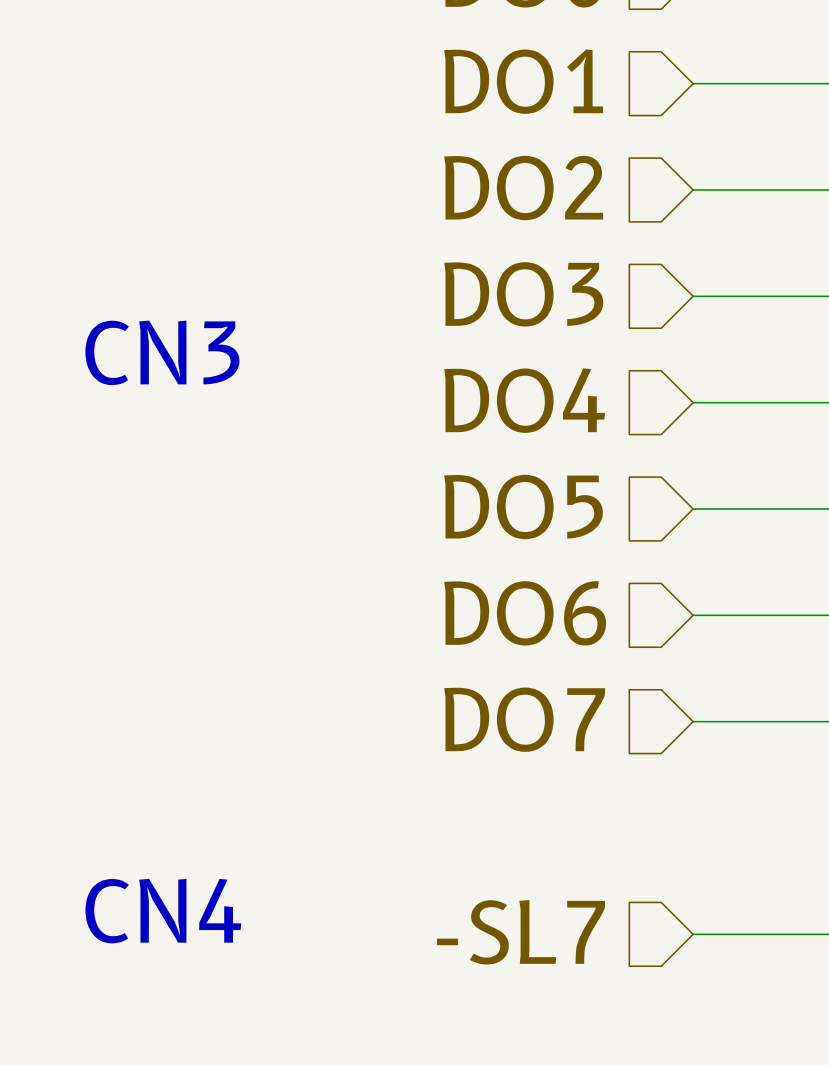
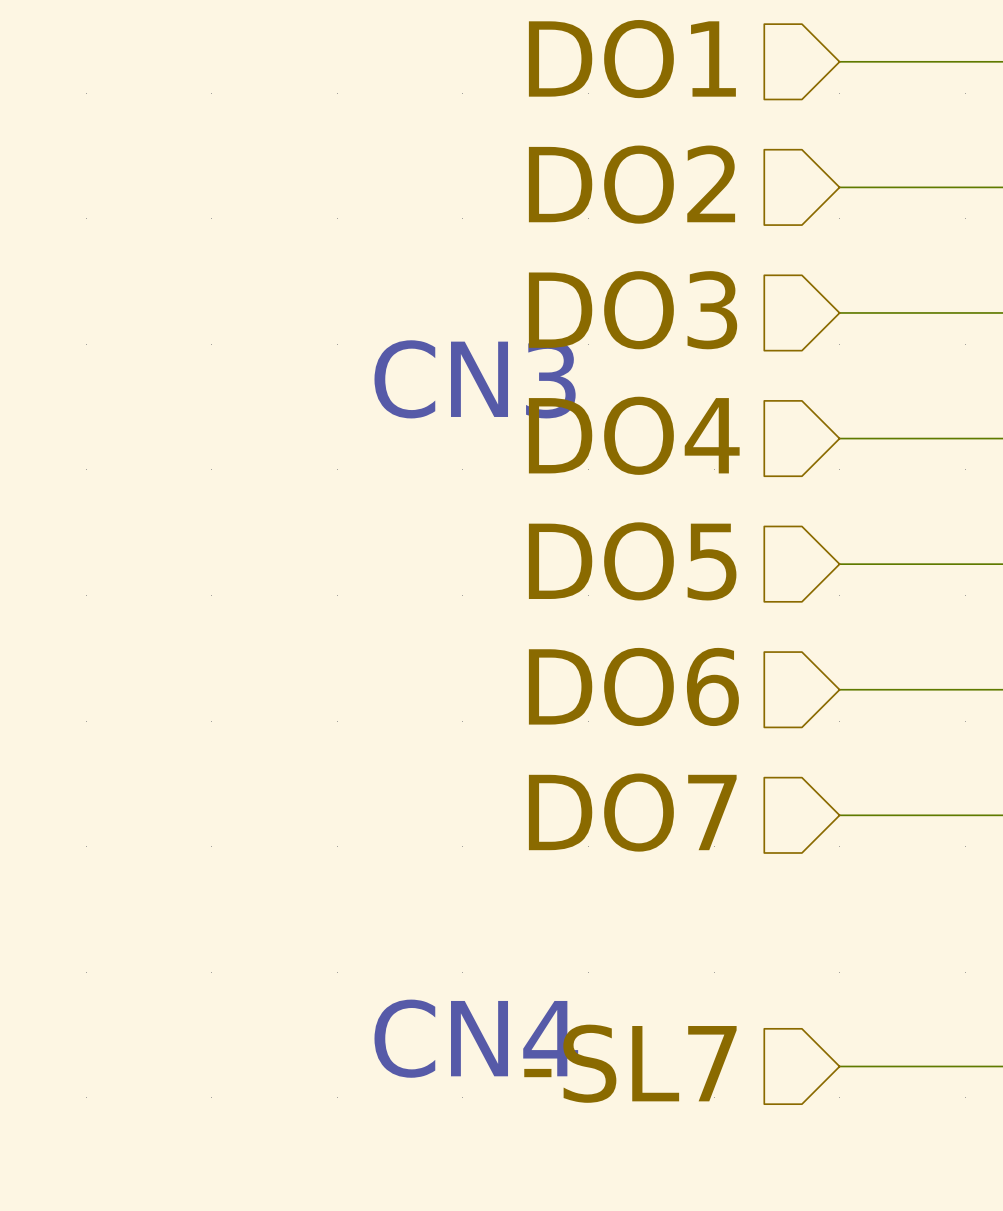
text position: CN3 (162, 352) -> CN3 (475, 379)
text position: CN4 (163, 911) -> CN4 (476, 1038)

